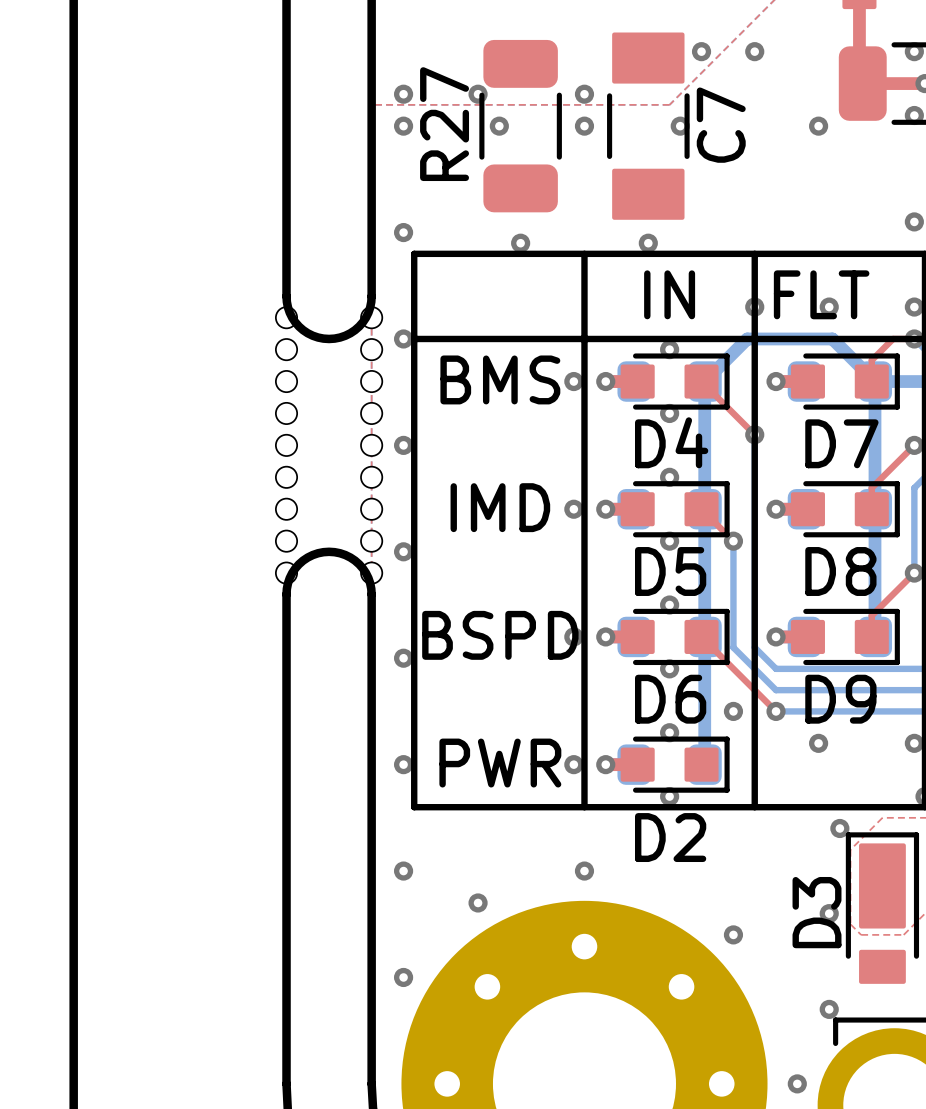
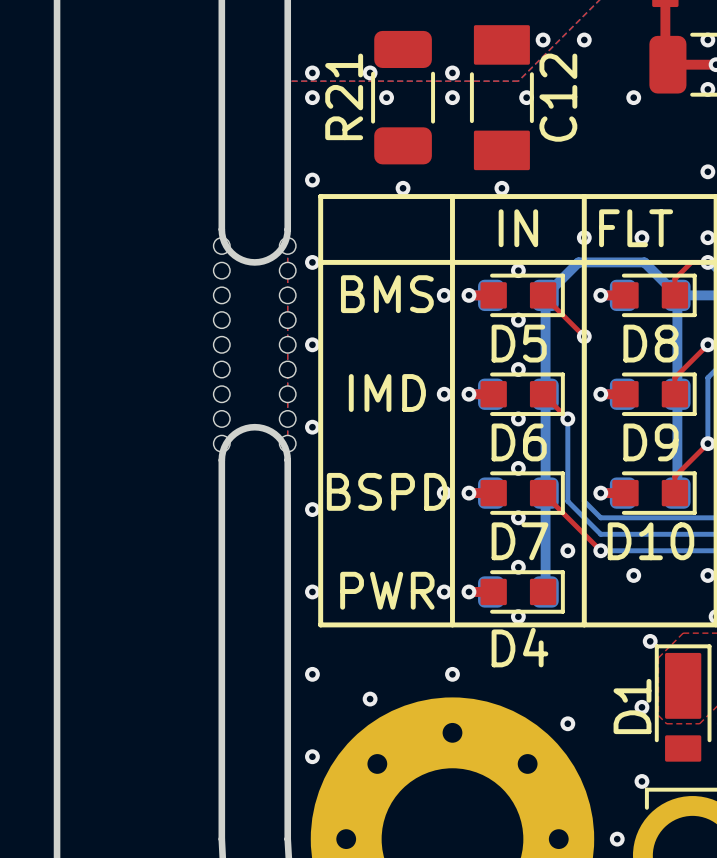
R27 name: R27 (444, 124) -> R21 (344, 96)
C7 name: C7 (721, 125) -> C12 (558, 97)
D4 name: D4 (671, 442) -> D5 (519, 343)
D7 name: D7 (841, 443) -> D8 (650, 343)
D5 name: D5 (670, 571) -> D6 (519, 442)
D8 name: D8 (840, 571) -> D9 (650, 442)
D6 name: D6 (670, 699) -> D7 (519, 541)
D9 name: D9 (840, 699) -> D10 (650, 541)
D2 name: D2 (670, 837) -> D4 (519, 647)
D3 name: D3 (817, 912) -> D1 (632, 706)

